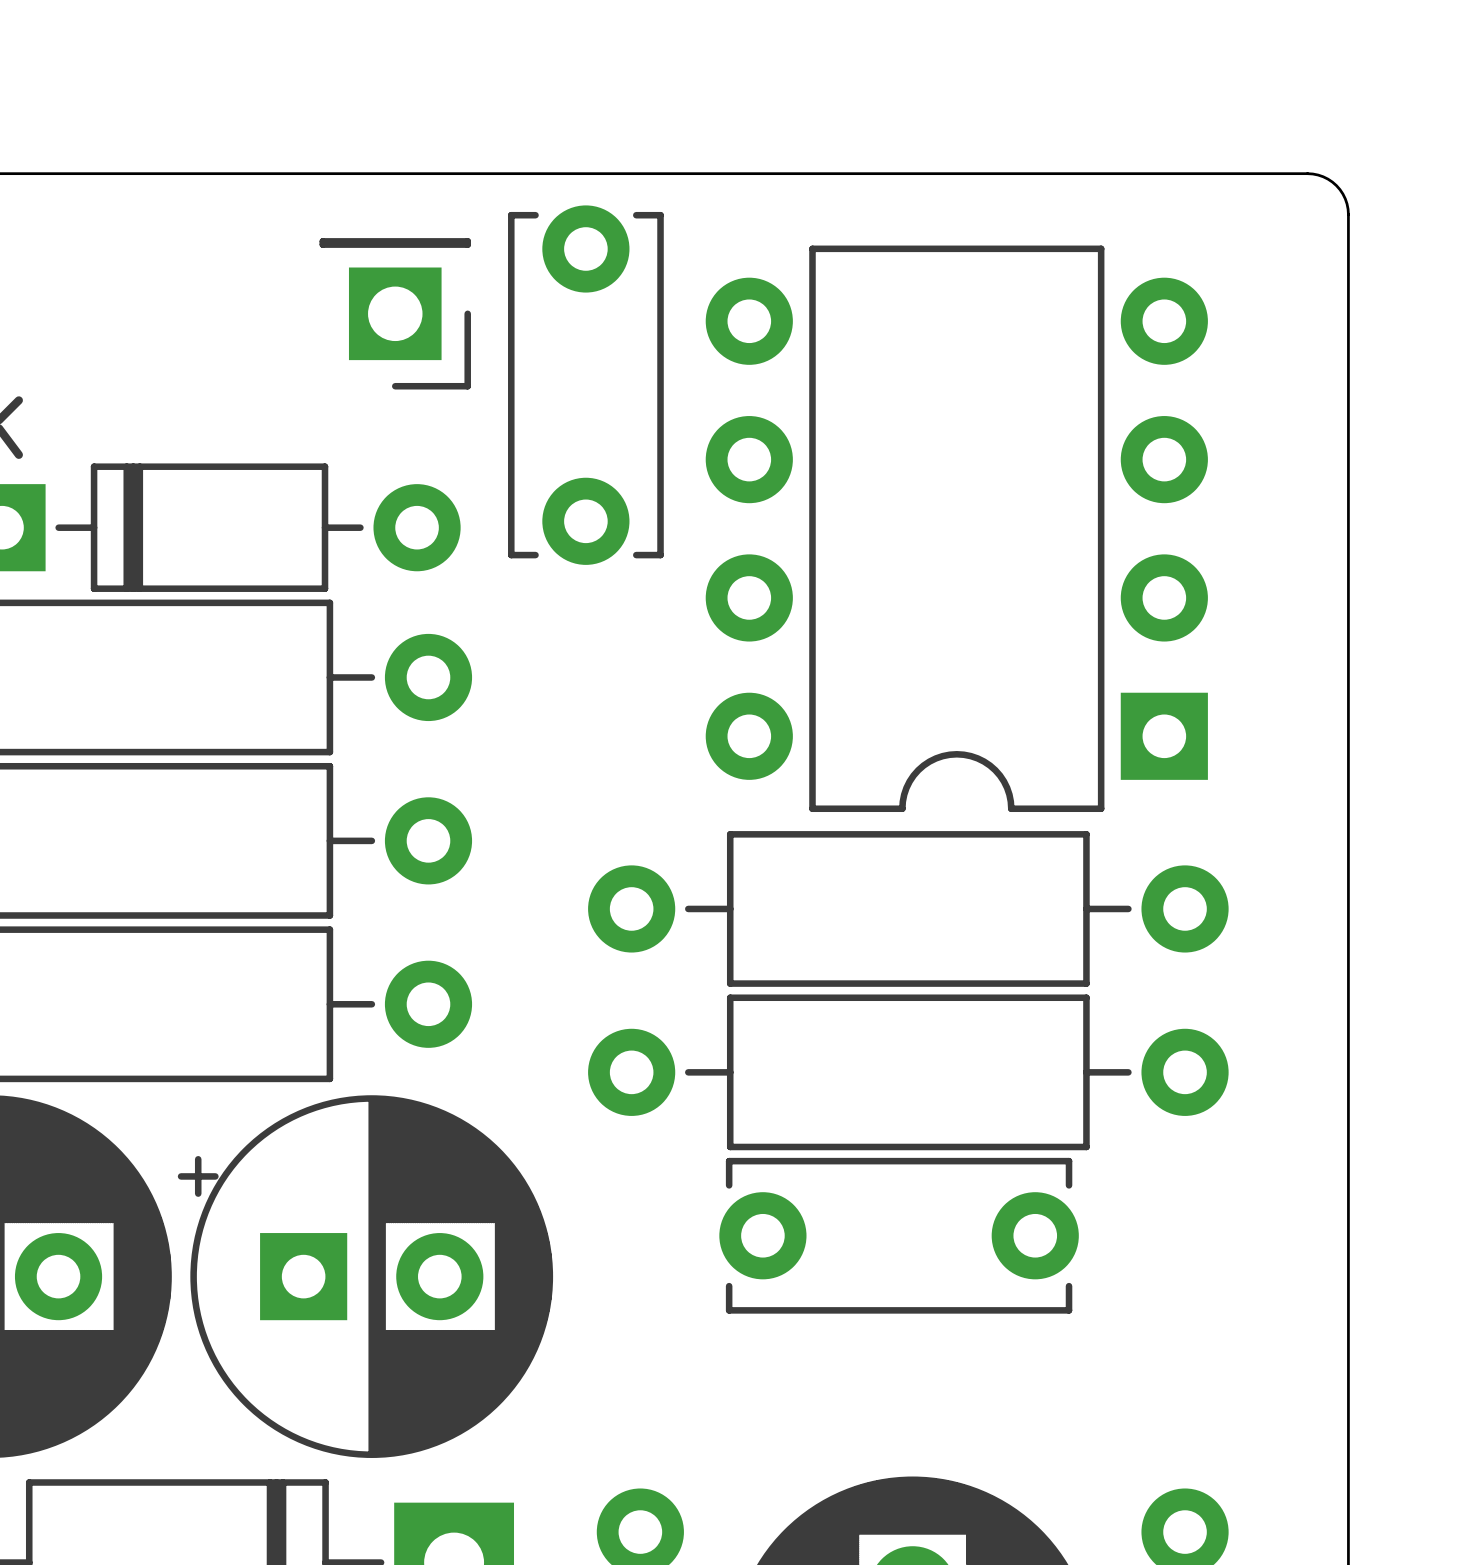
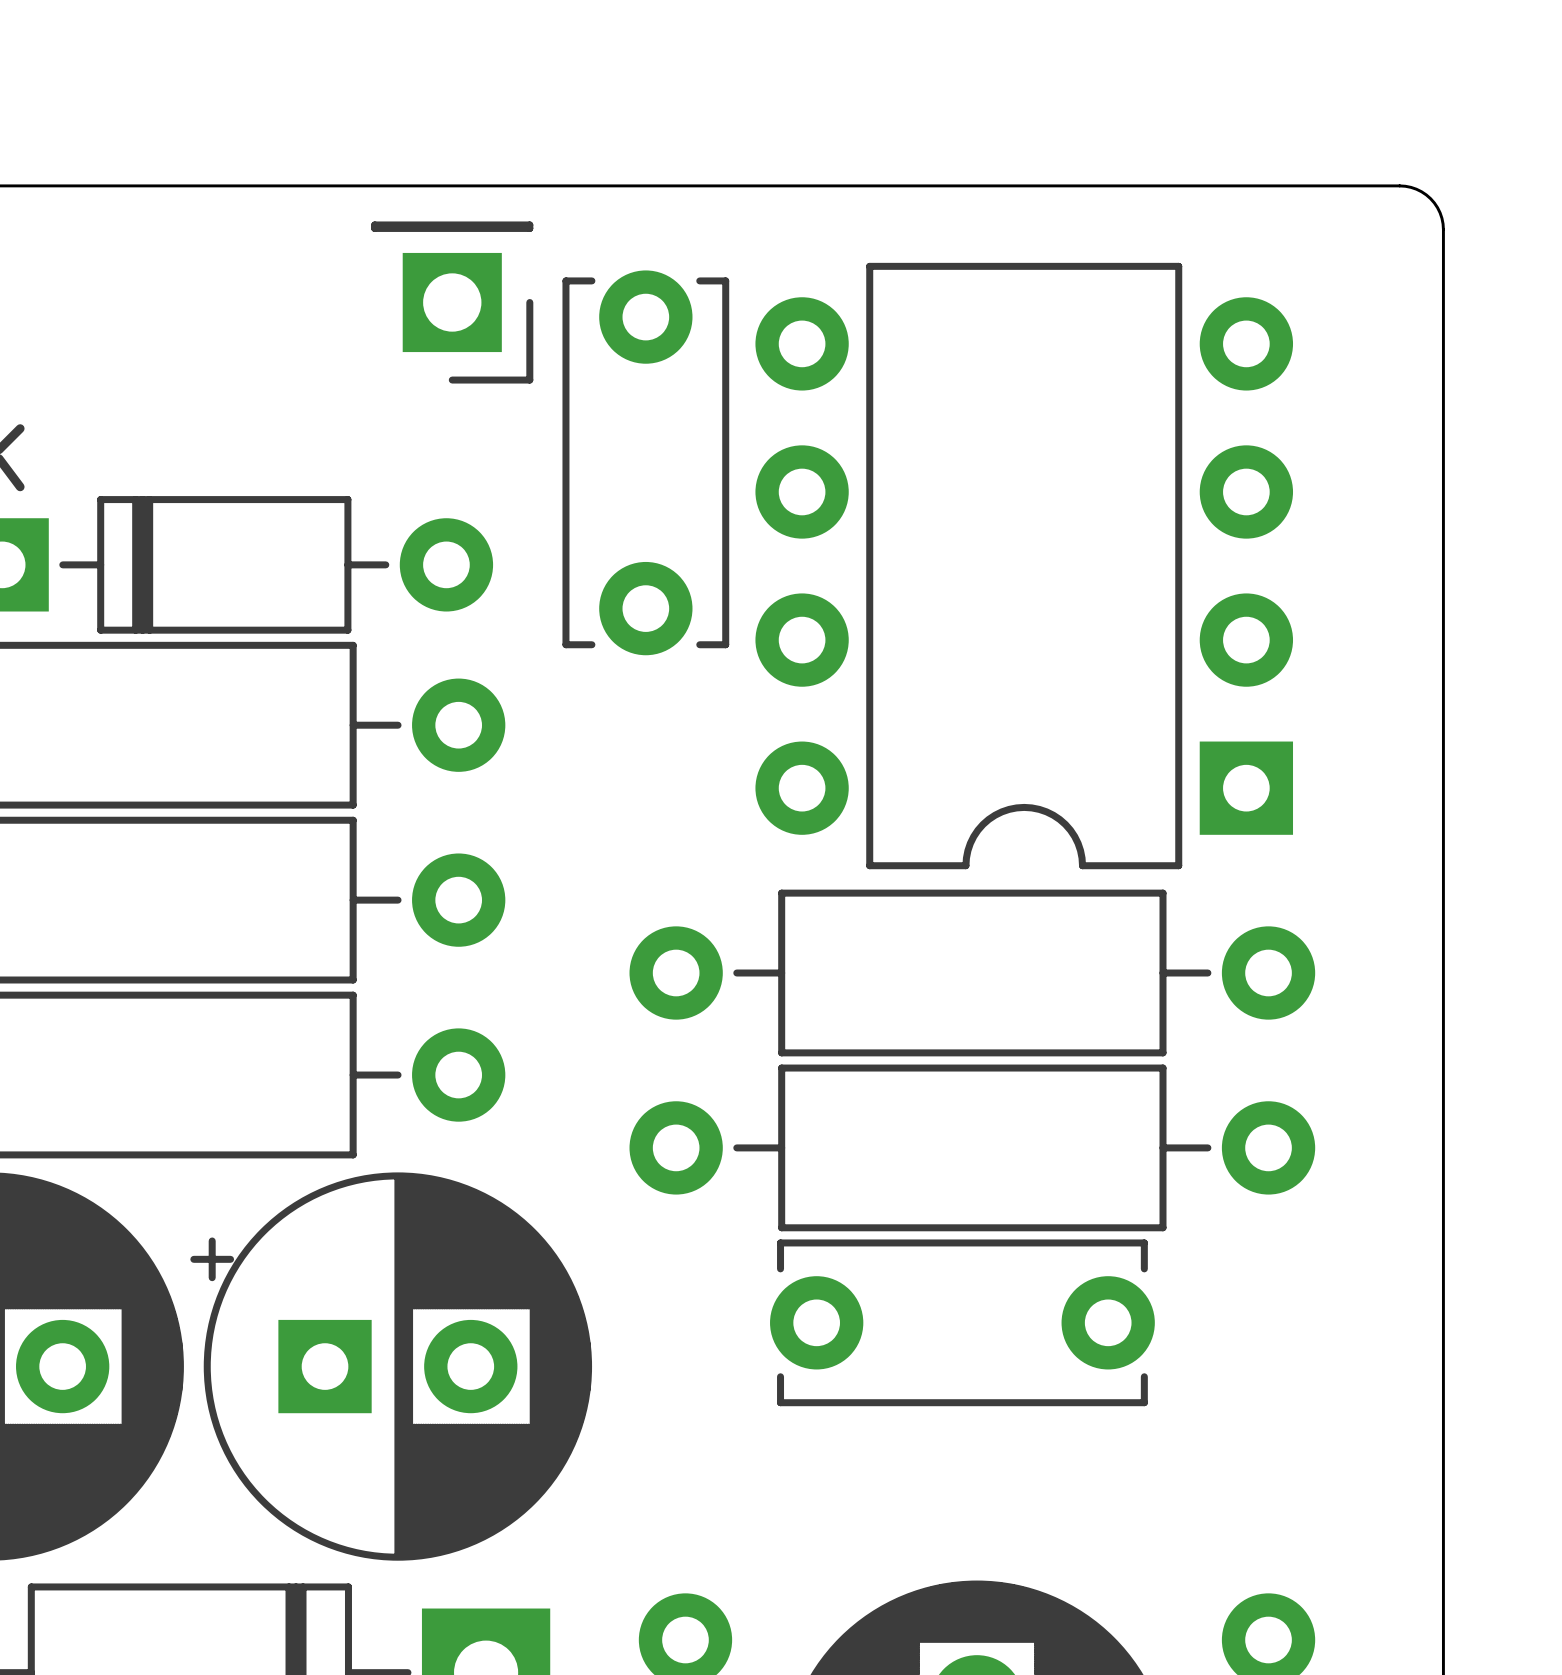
part position: (395, 313) -> (452, 302)
part position: (585, 385) -> (645, 462)

